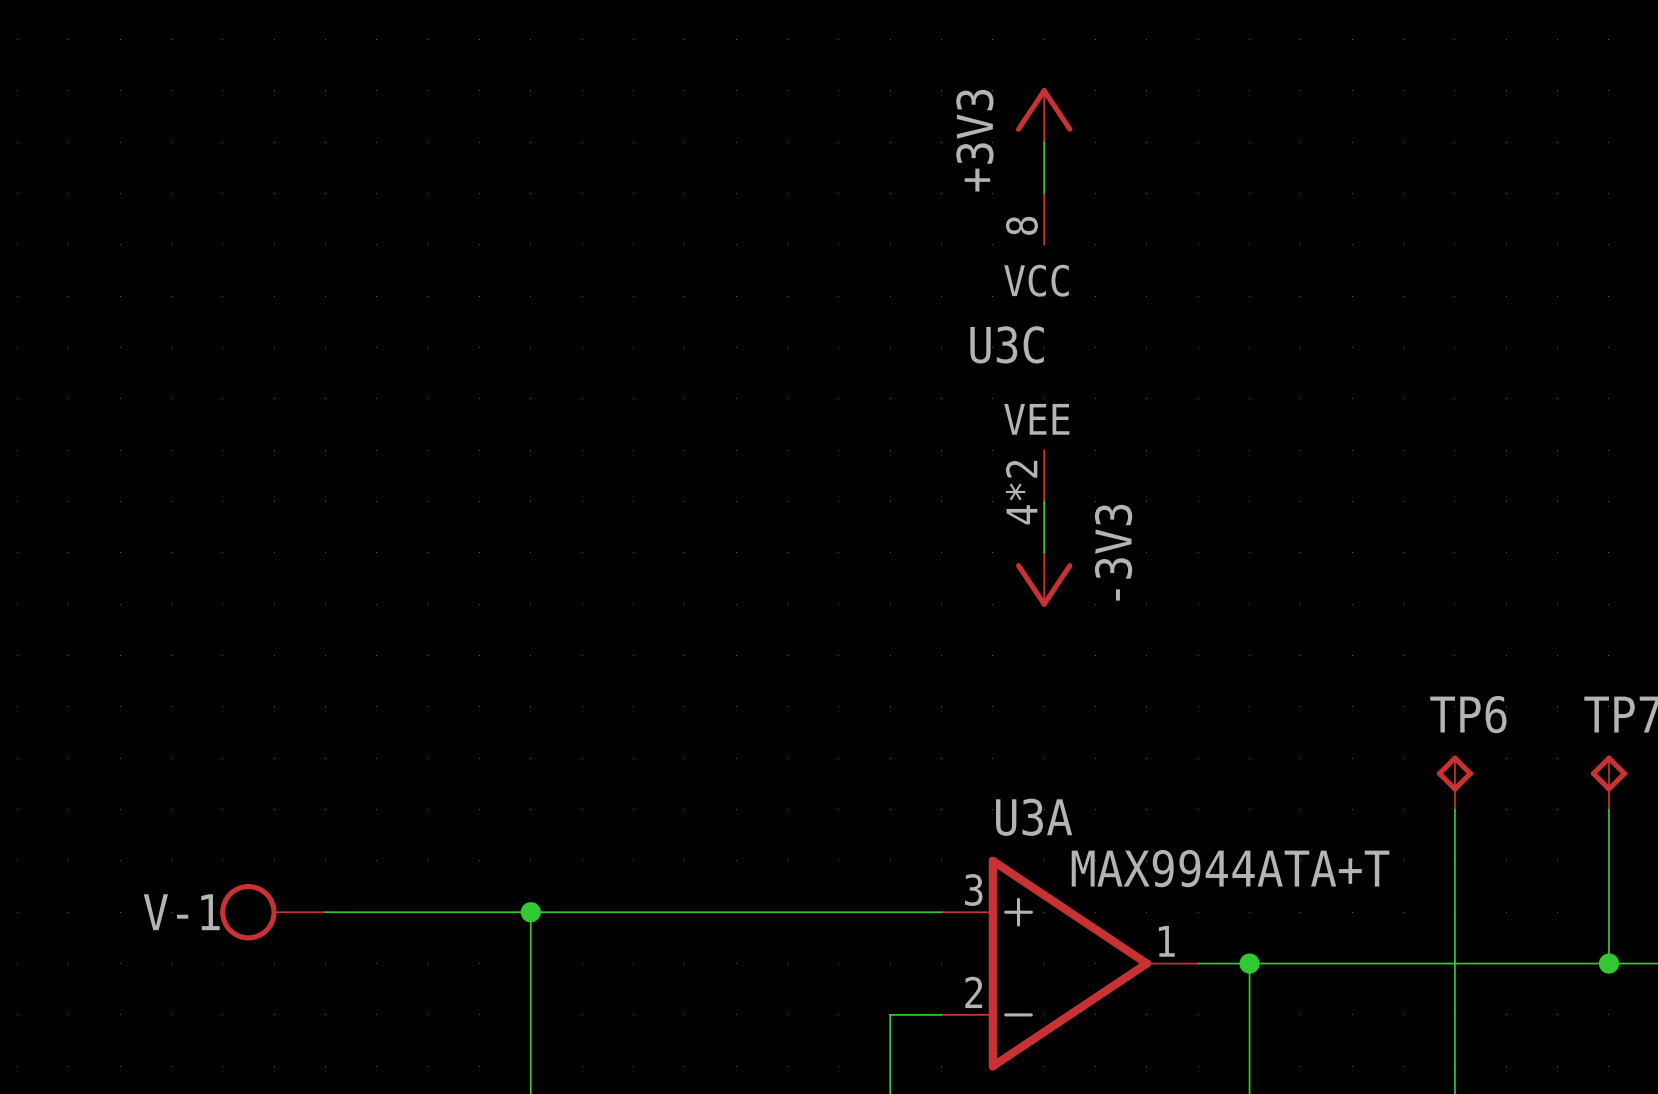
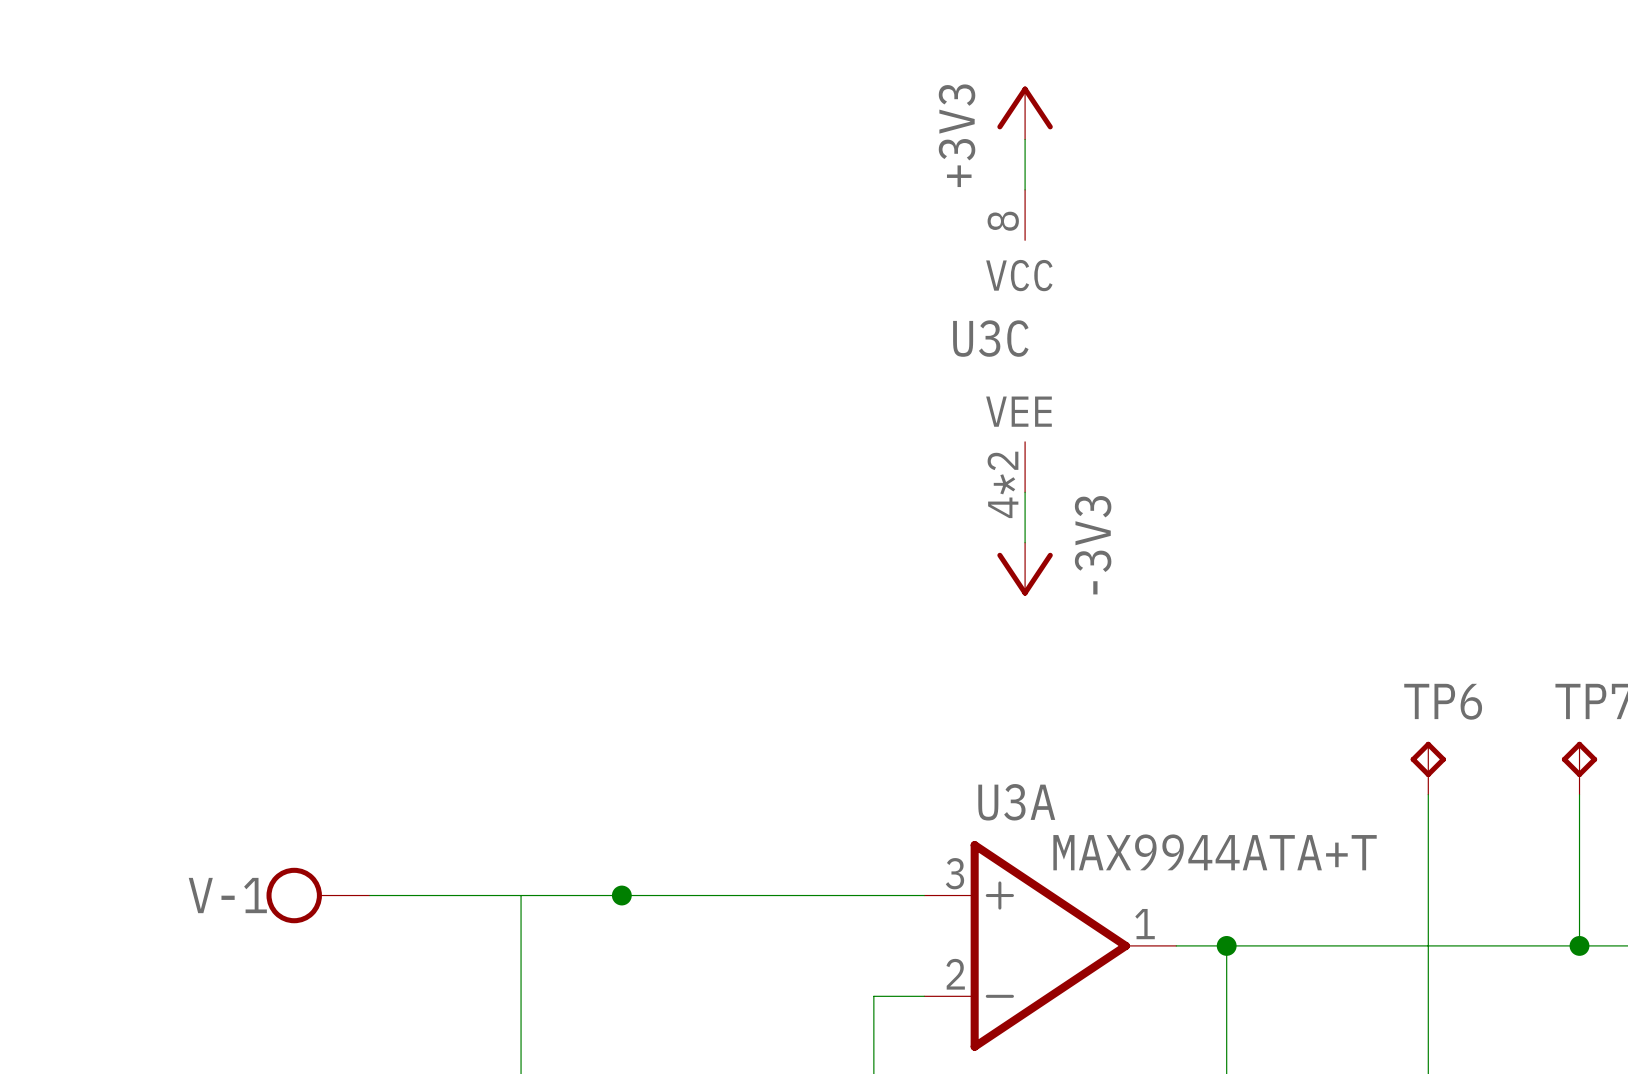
V-1 position: (272, 912) -> (318, 895)
junction position: (530, 912) -> (621, 895)

